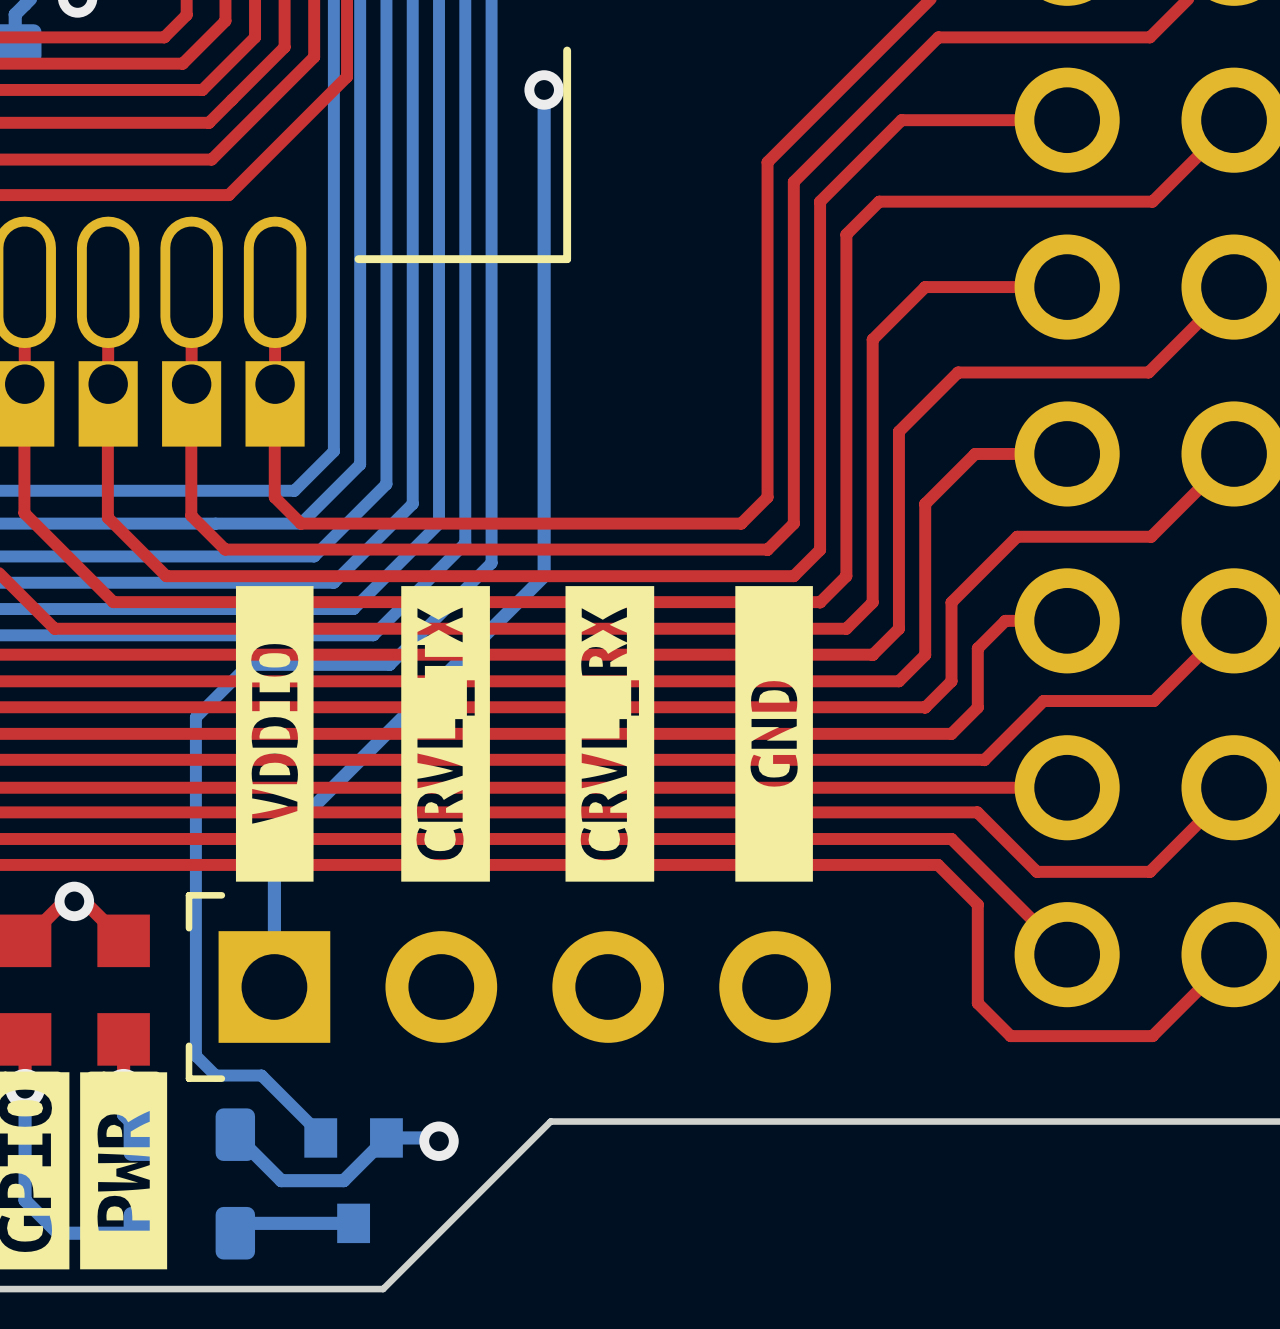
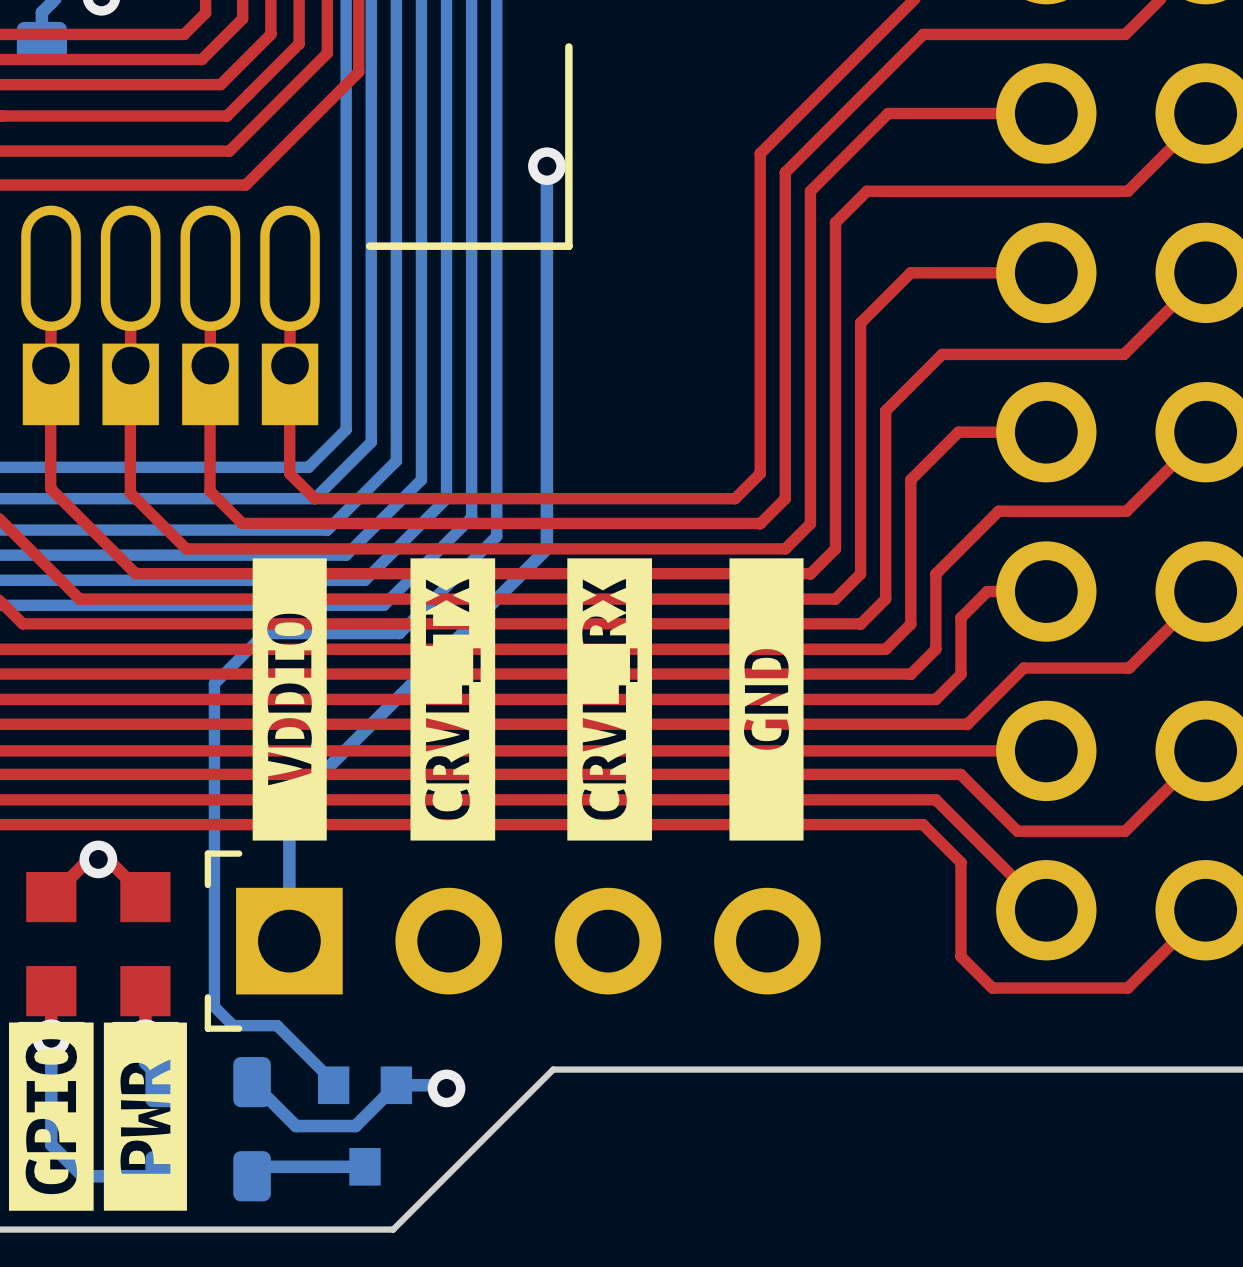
bottom track: (544, 89) (544, 175) -> none
via position: (544, 89) -> (546, 166)

